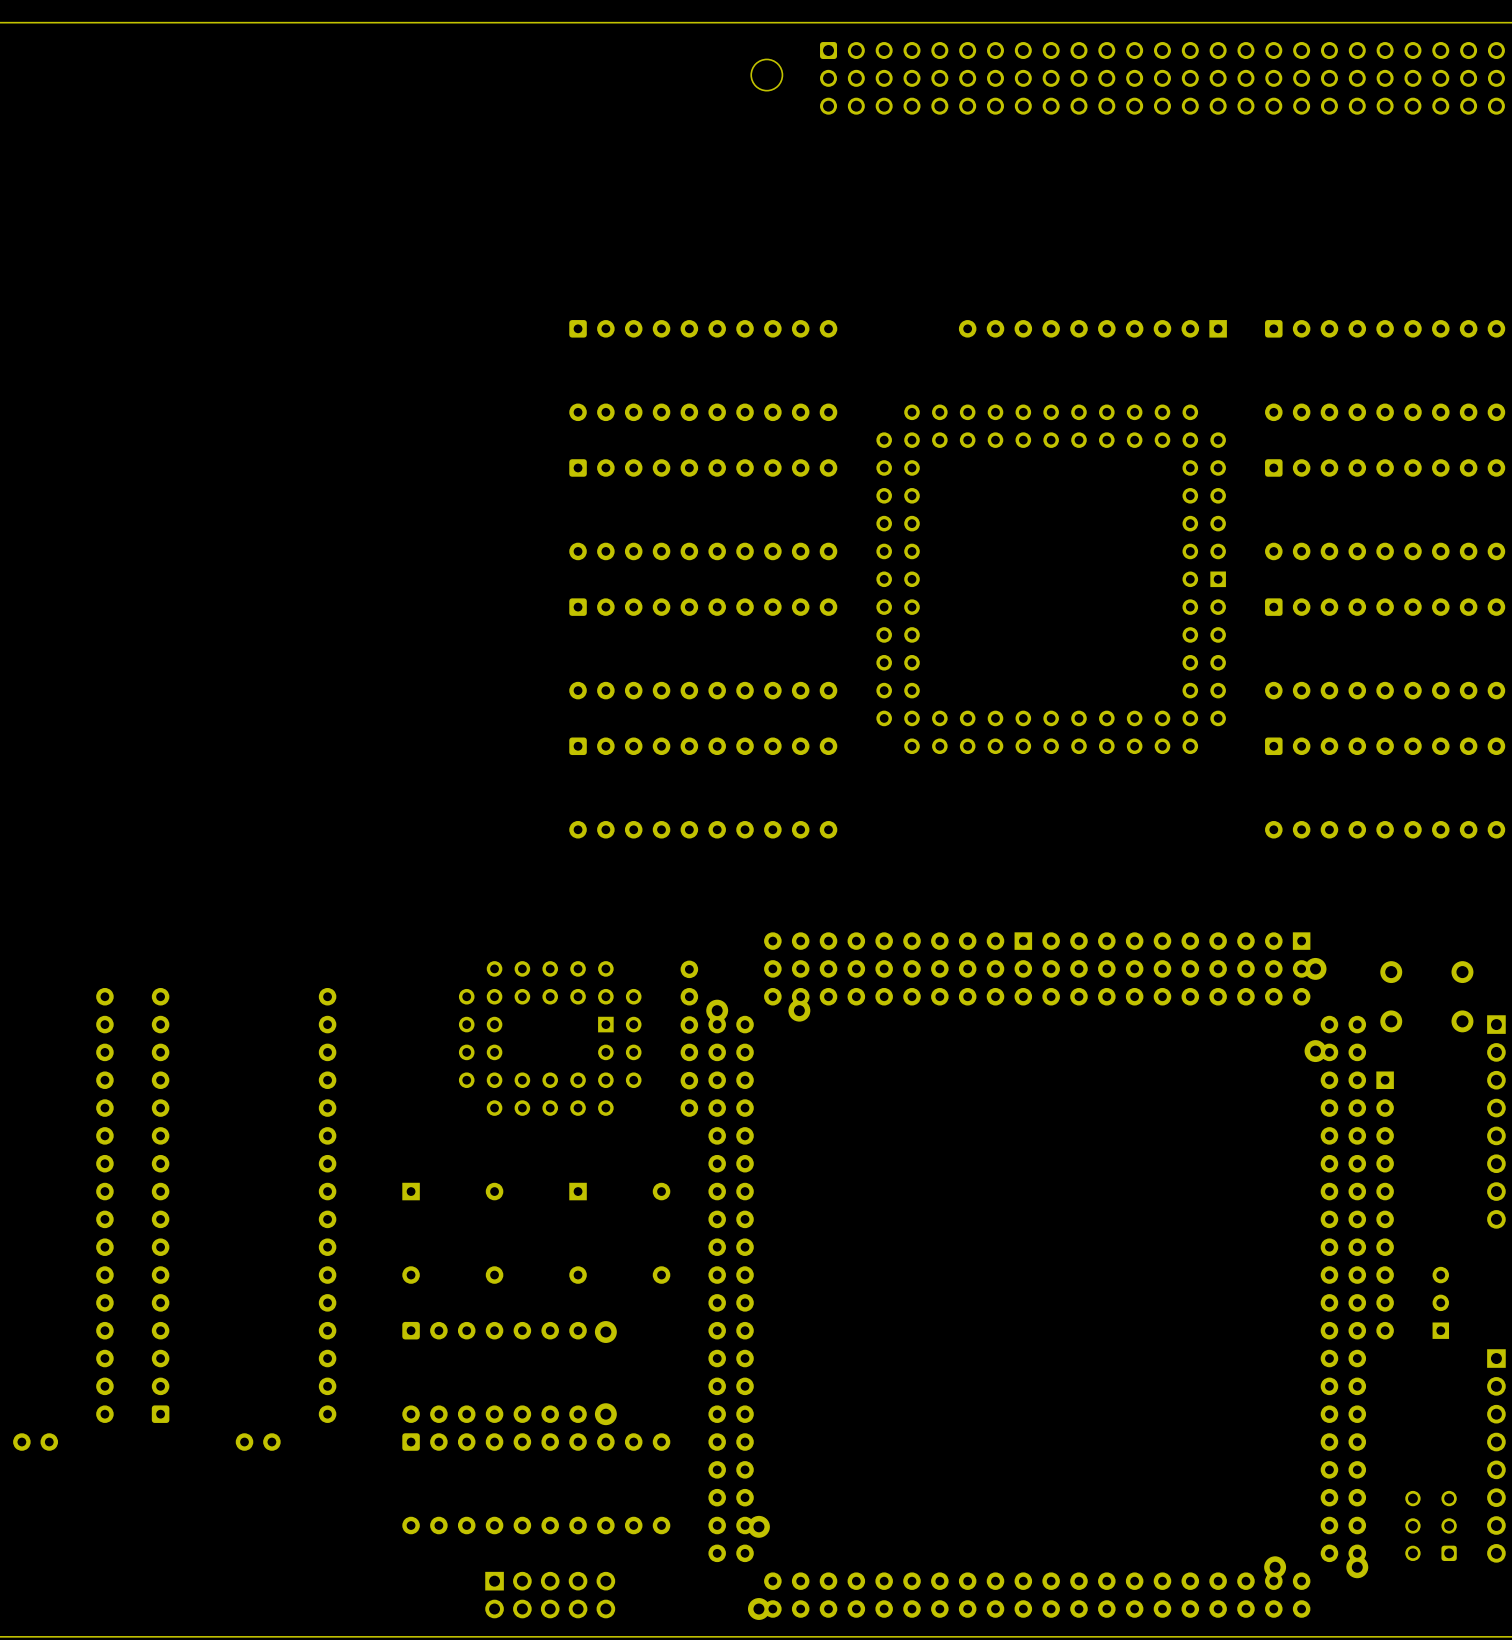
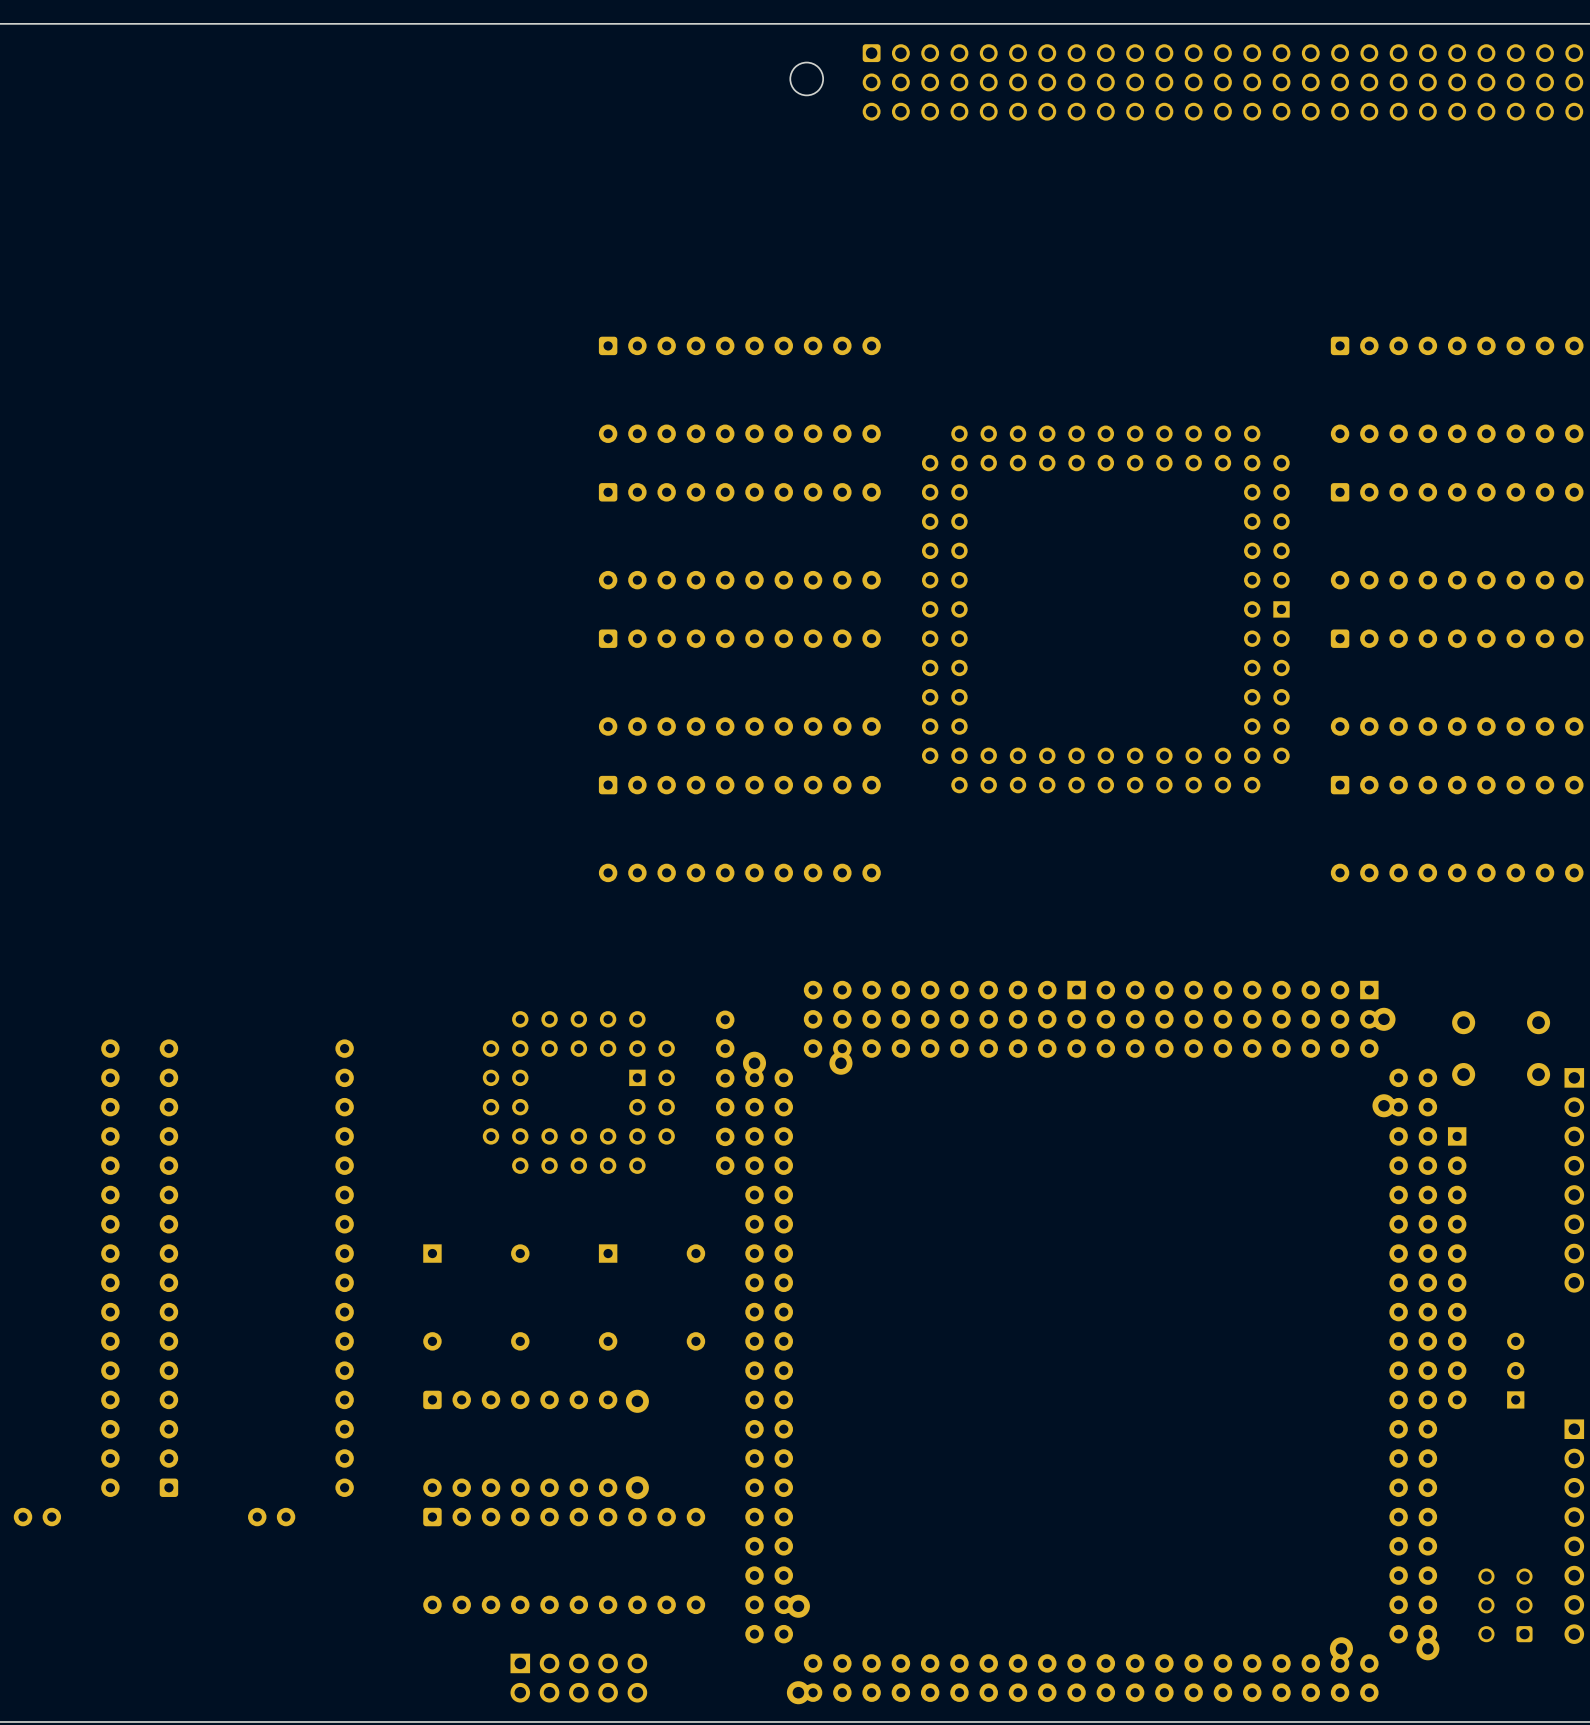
part: (1092, 328) -> none

